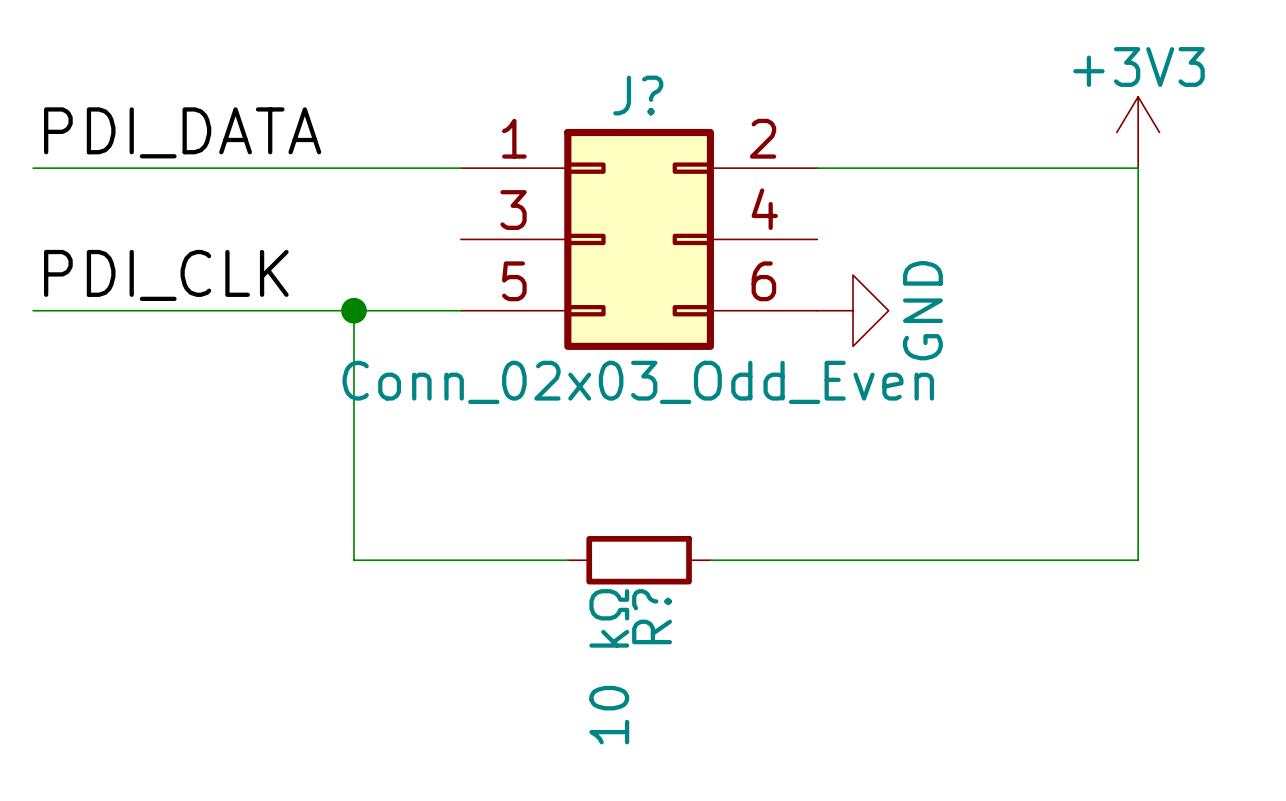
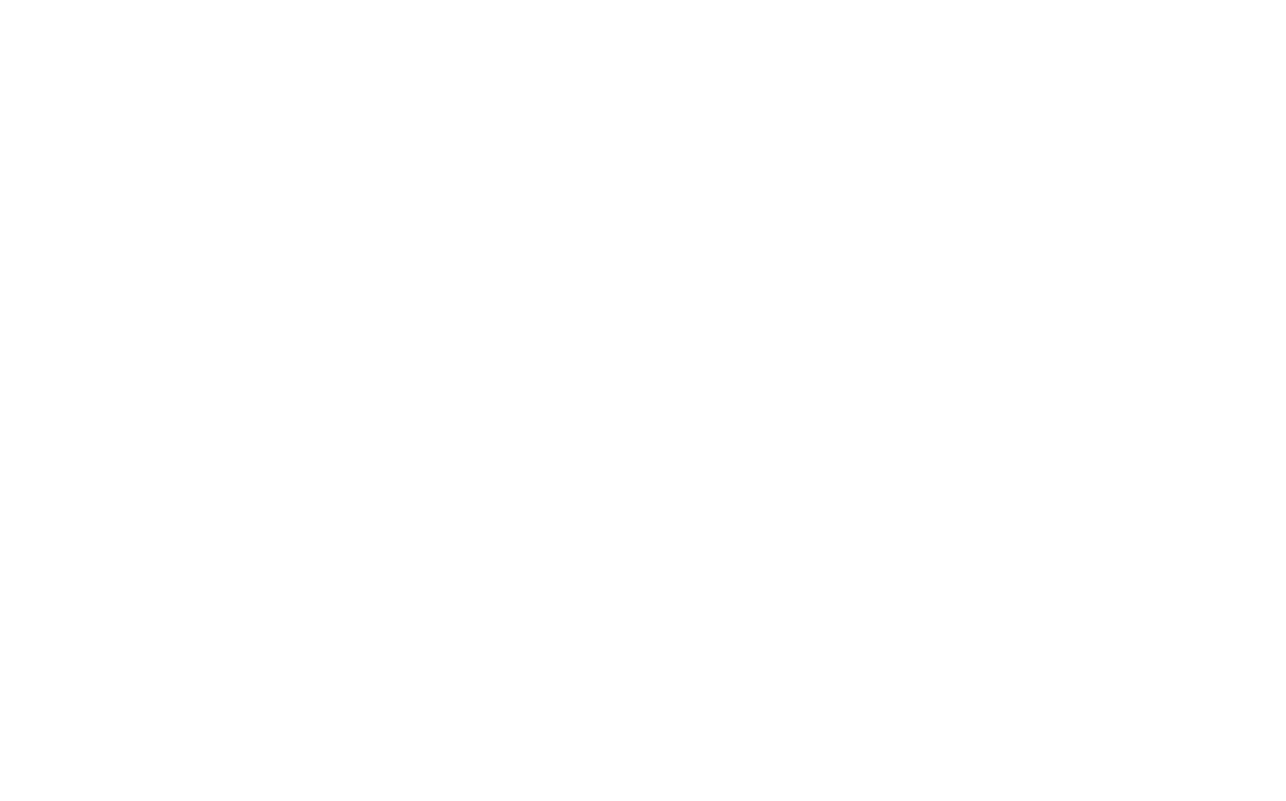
label: PDI_DATA (182, 132) -> none
power symbol: +3V3 (1138, 132) -> none
wire: (33, 168) (460, 168) -> none
wire: (817, 168) (1138, 168) (1138, 560) (710, 560) -> none
J?: Conn_02x03_Odd_Even (639, 239) -> none
label: PDI_CLK (166, 275) -> none
wire: (33, 310) (460, 310) -> none
wire: (353, 310) (353, 560) (567, 560) -> none
junction: (353, 310) -> none
power symbol: GND (852, 310) -> none
R?: 10 kΩ (639, 560) -> none

